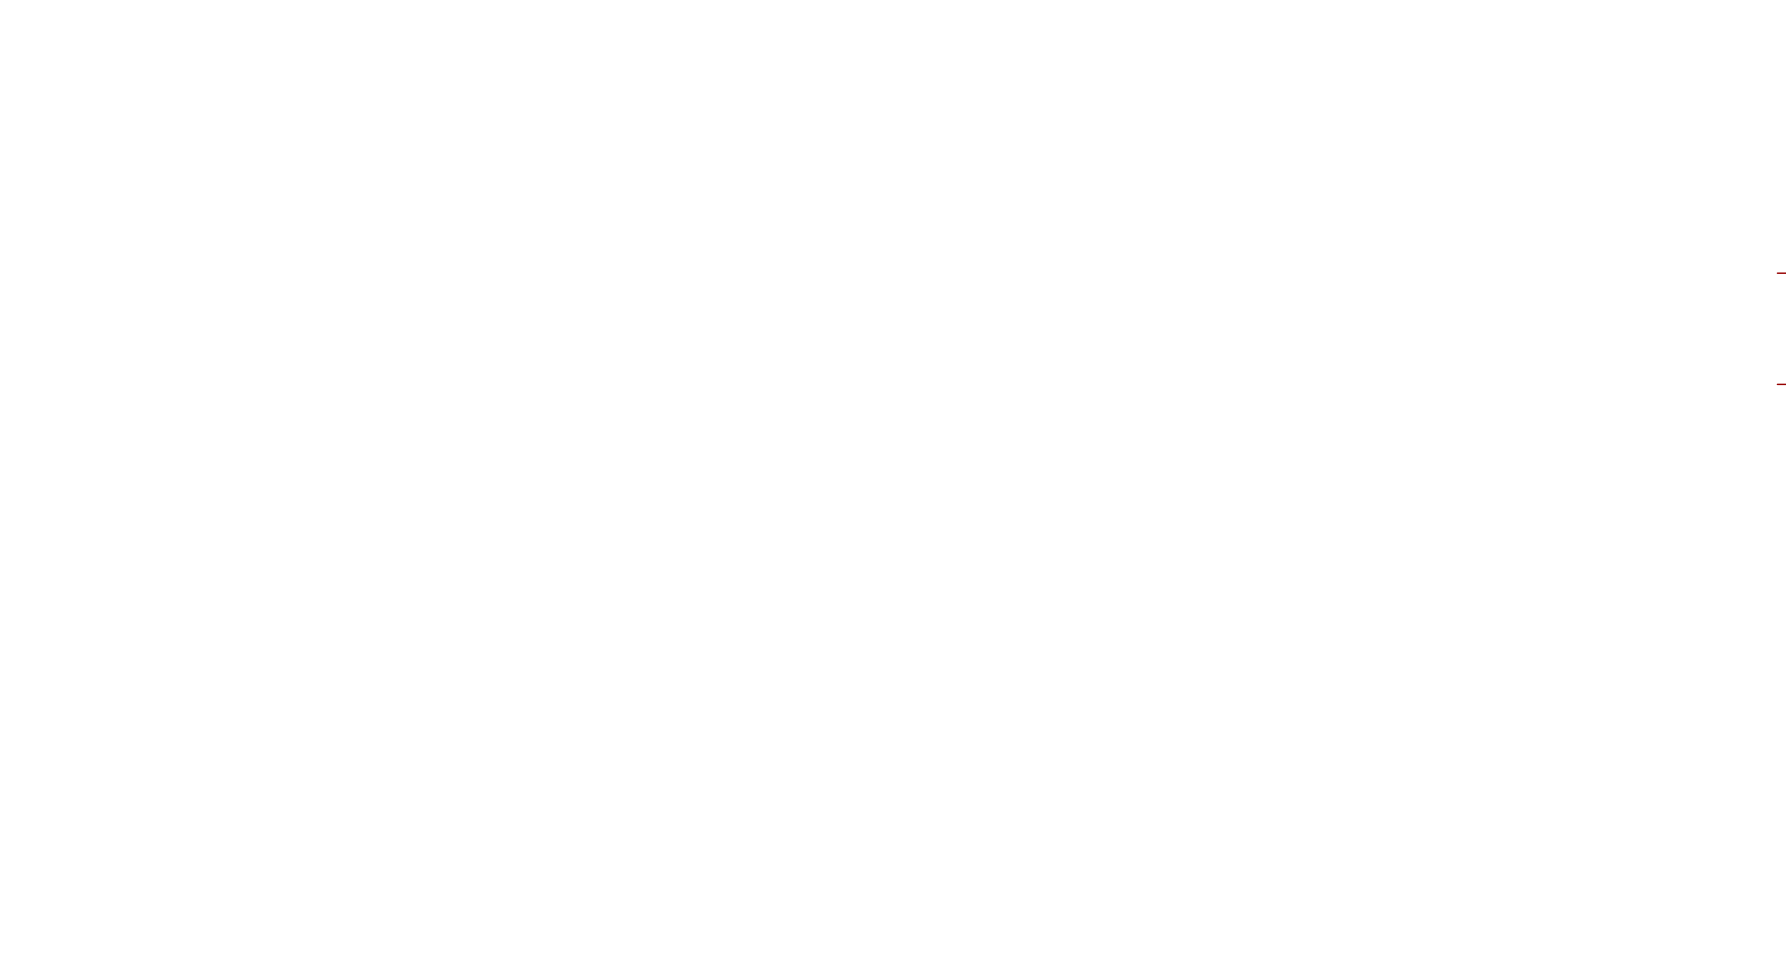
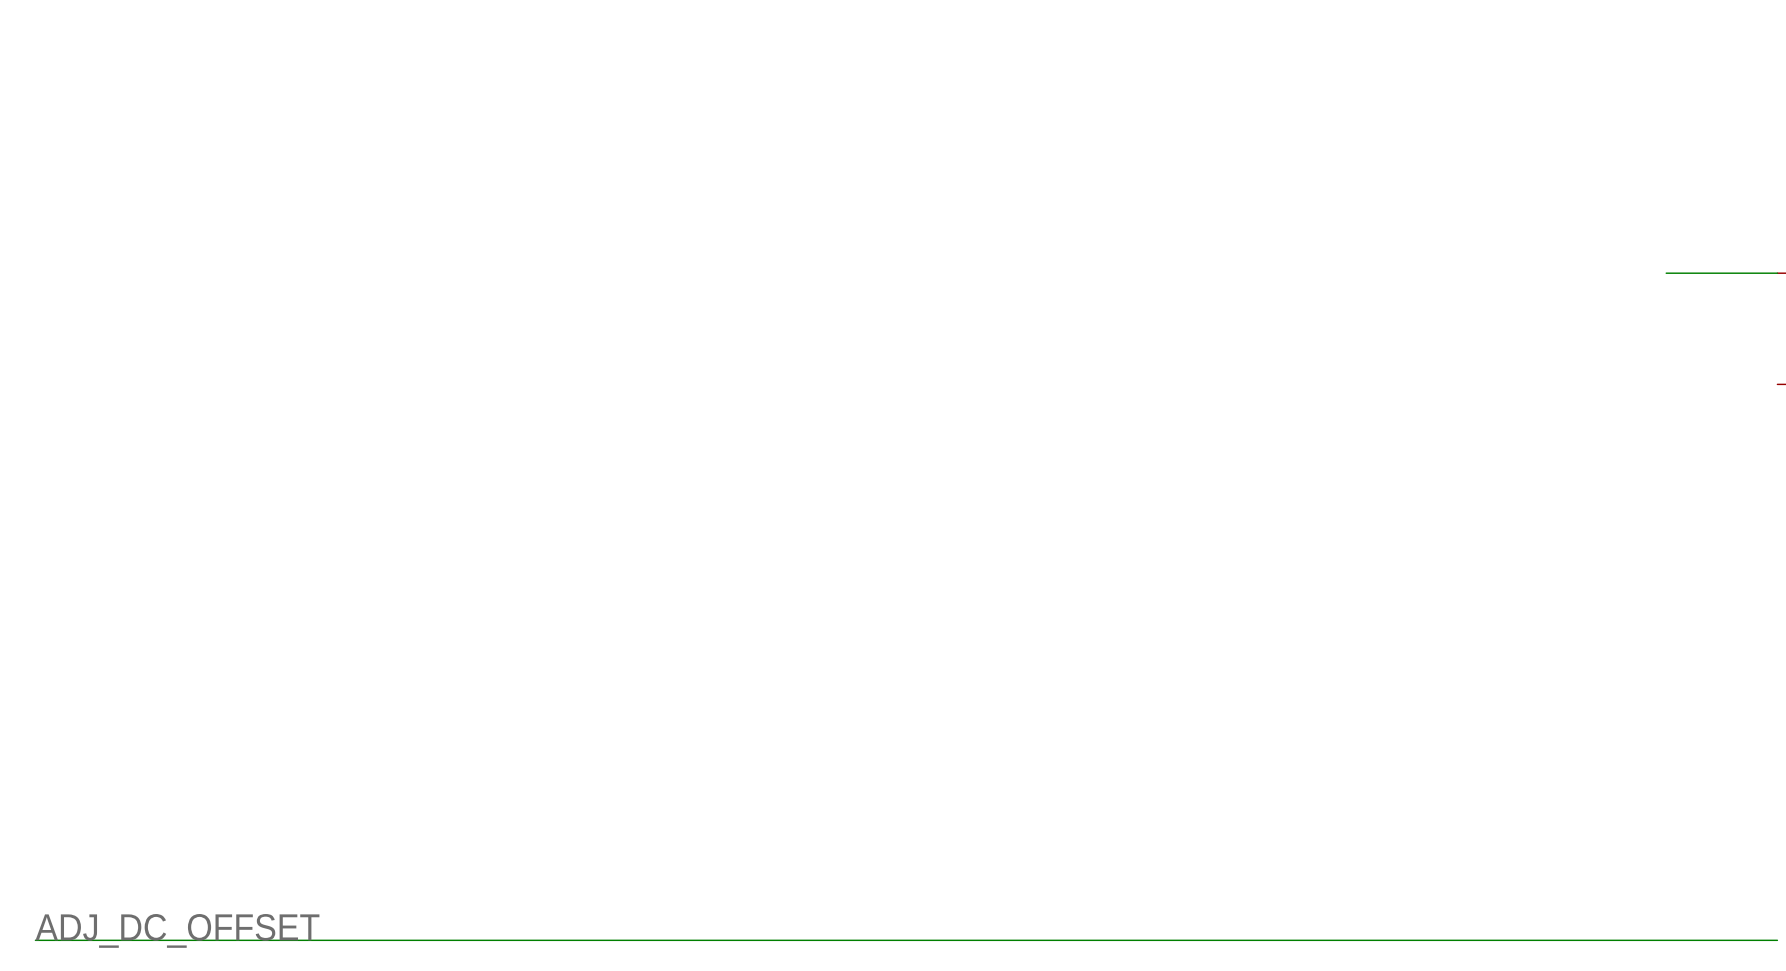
wire: none -> (1666, 273) (1777, 273)
label: none -> ADJ_DC_OFFSET (177, 930)
wire: none -> (35, 940) (1777, 940)

